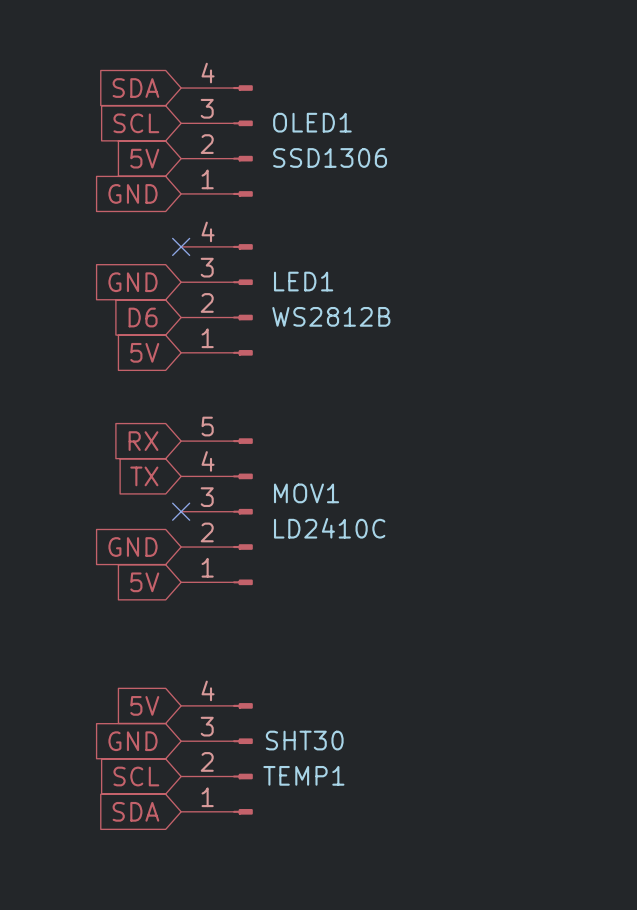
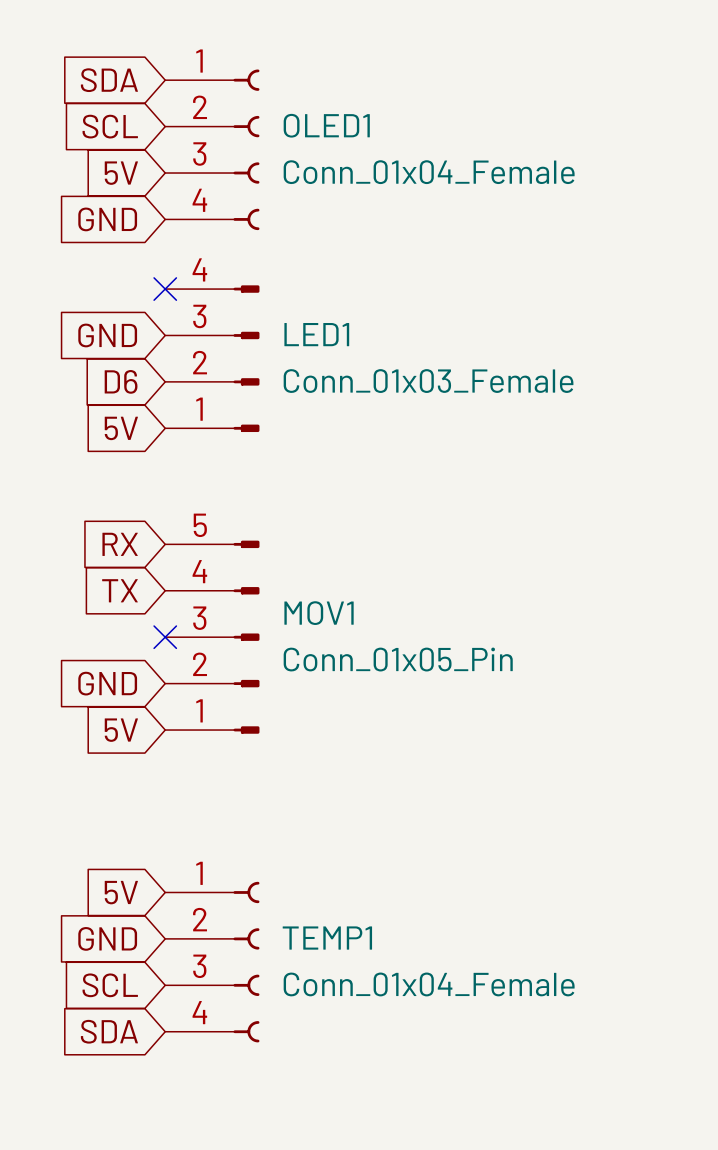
OLED1 symbol: [181, 85, 253, 197] -> [165, 69, 260, 231]
OLED1 value: SSD1306 (330, 157) -> Conn_01x04_Female (429, 172)
LED1 value: WS2812B (331, 316) -> Conn_01x03_Female (428, 381)
MOV1 value: LD2410C (329, 528) -> Conn_01x05_Pin (398, 659)
TEMP1 symbol: [181, 703, 253, 815] -> [165, 881, 260, 1043]
TEMP1 value: SHT30 (304, 740) -> Conn_01x04_Female (429, 984)
TEMP1 name position: TEMP1 (303, 775) -> TEMP1 (327, 938)

